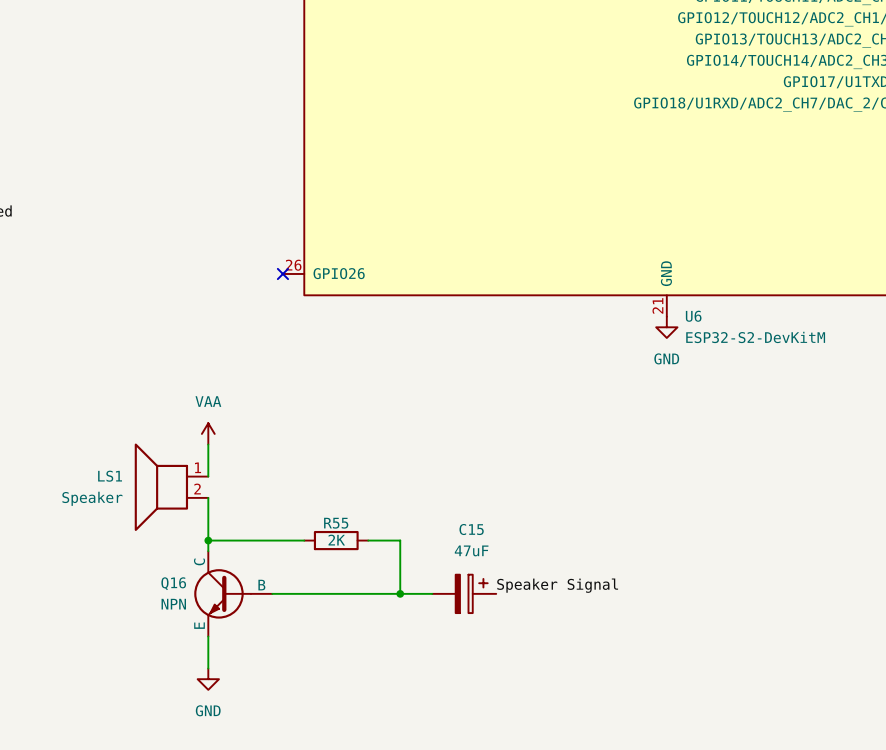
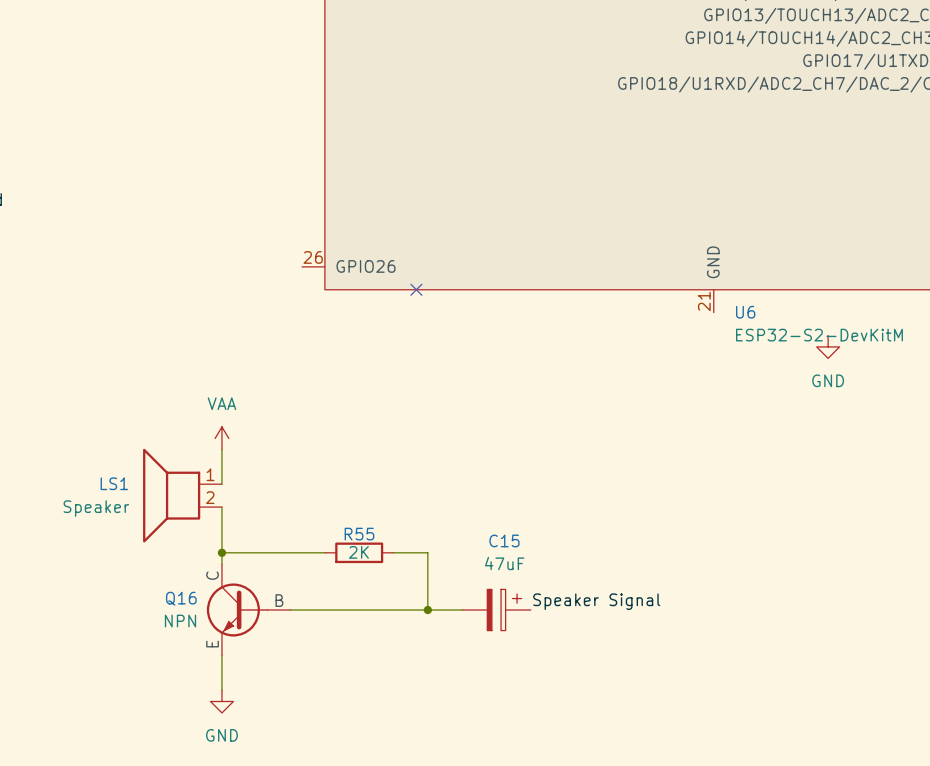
no-connect mark: (282, 273) -> none
no-connect mark: none -> (416, 289)
power symbol position: GND (666, 327) -> GND (828, 346)

